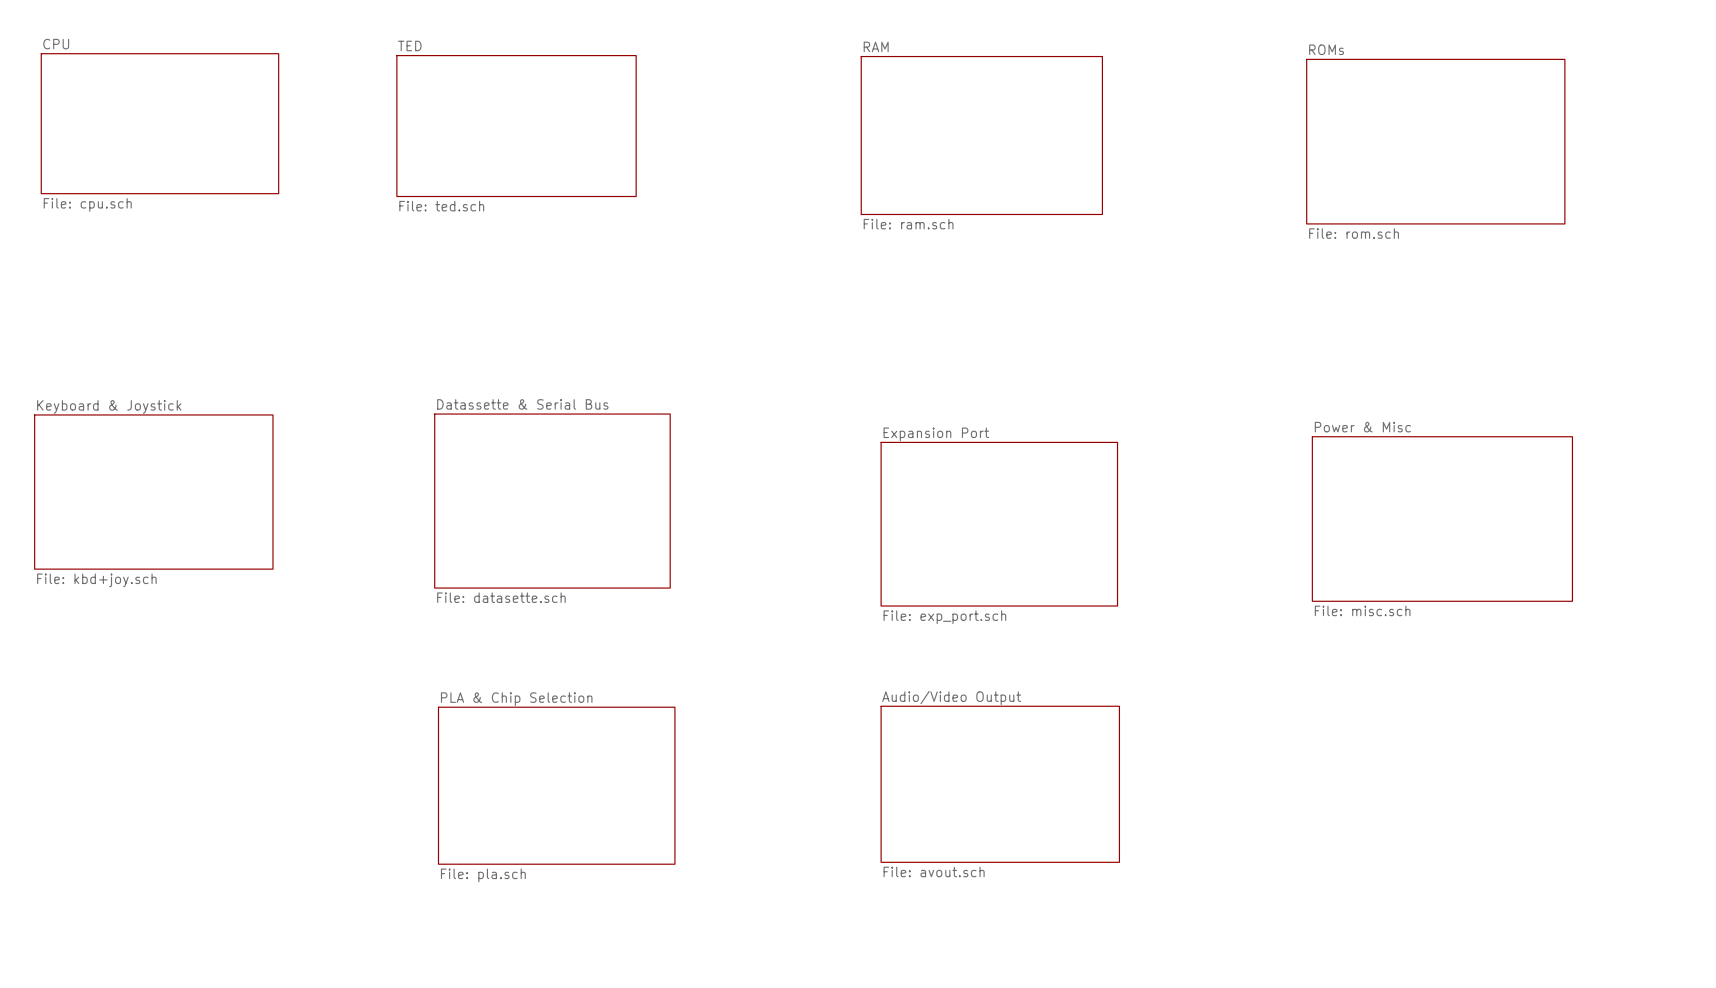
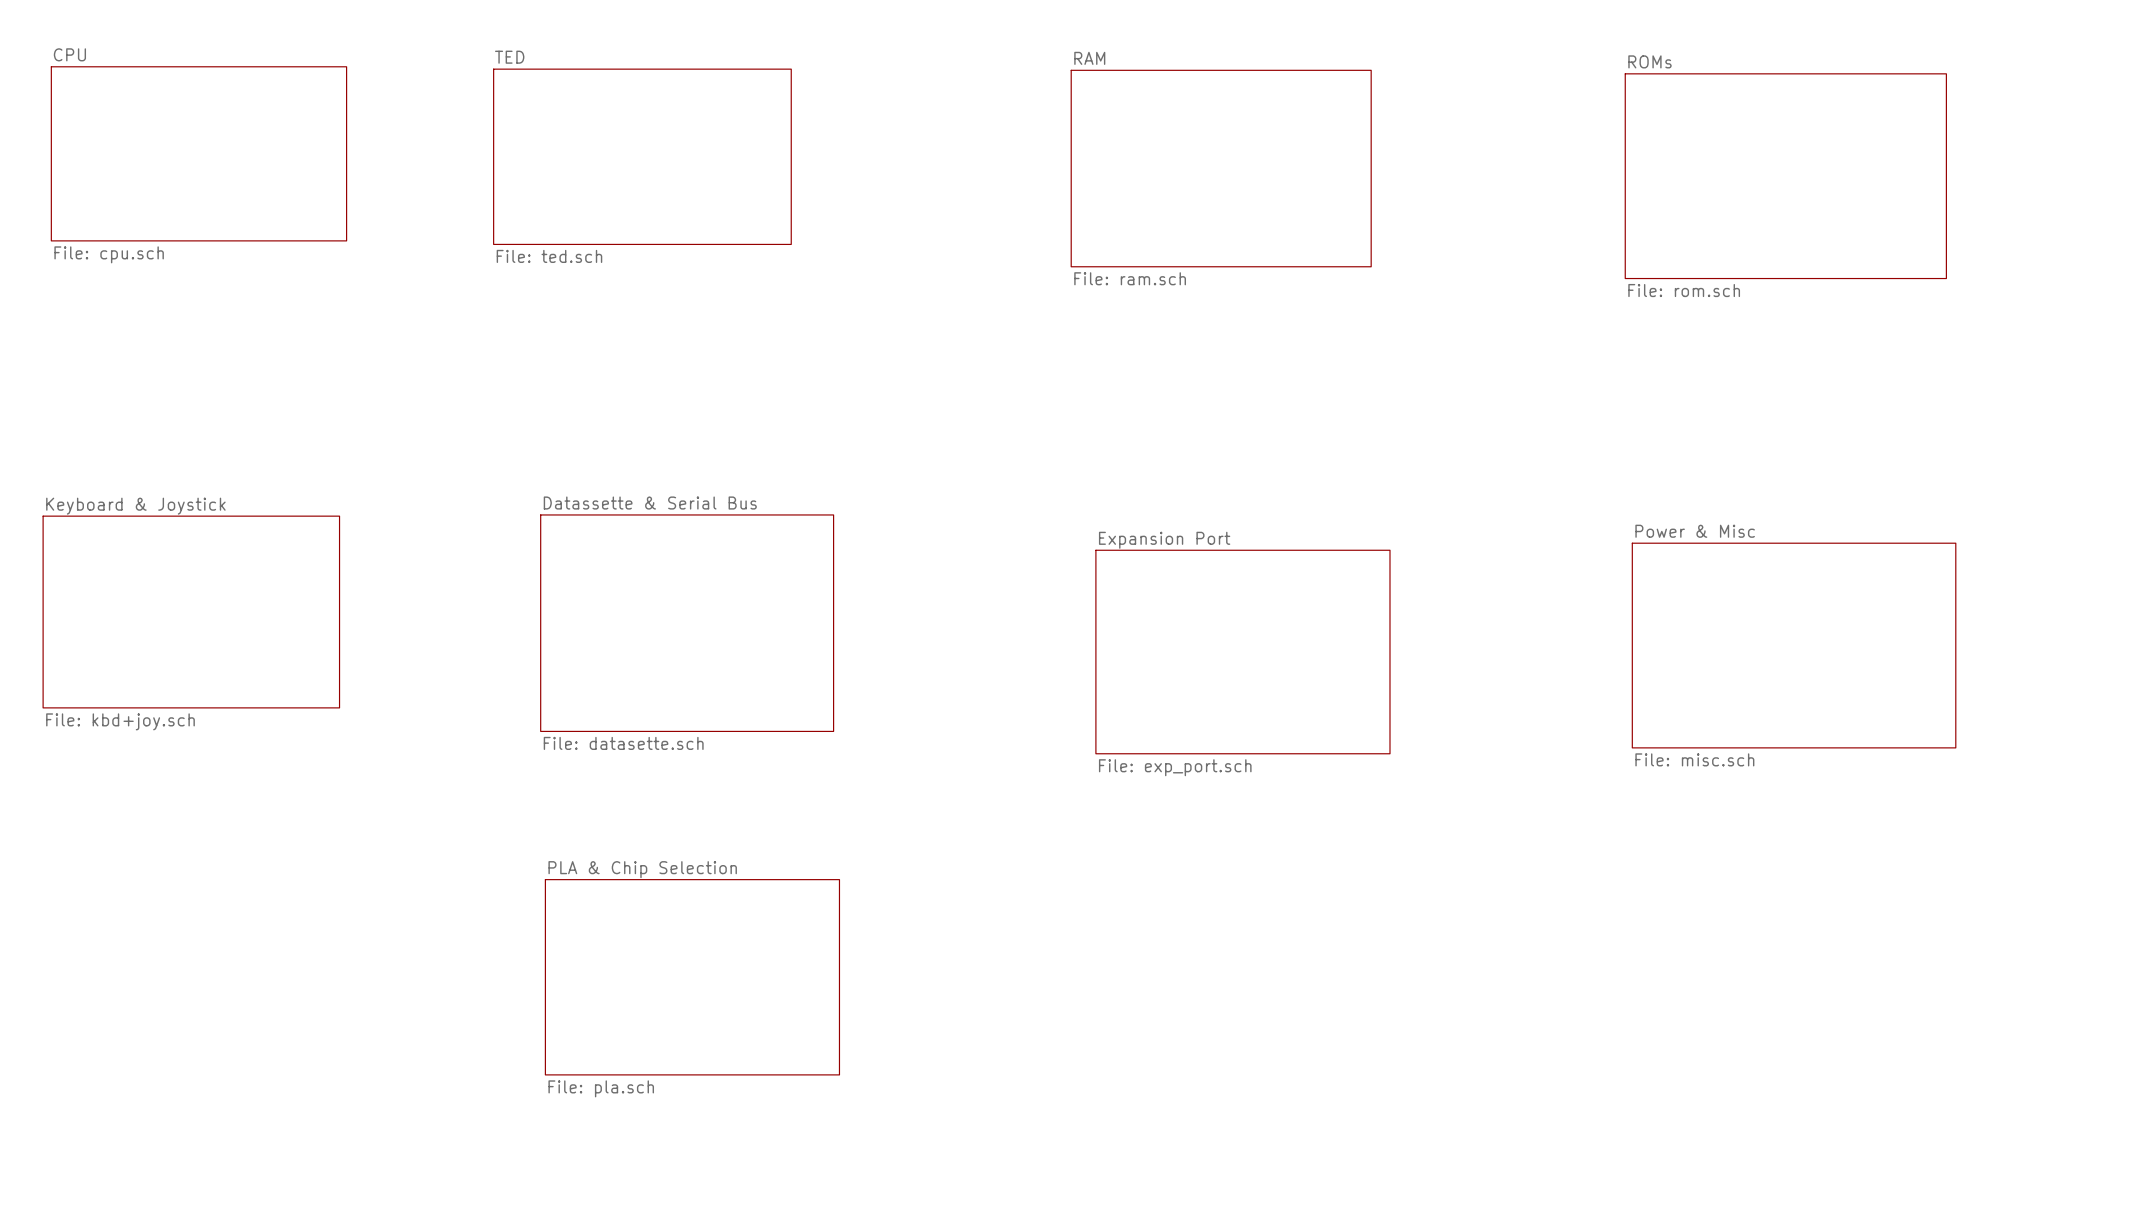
sheet Audio/Video Output: File: avout.sch (1000, 784) -> none

